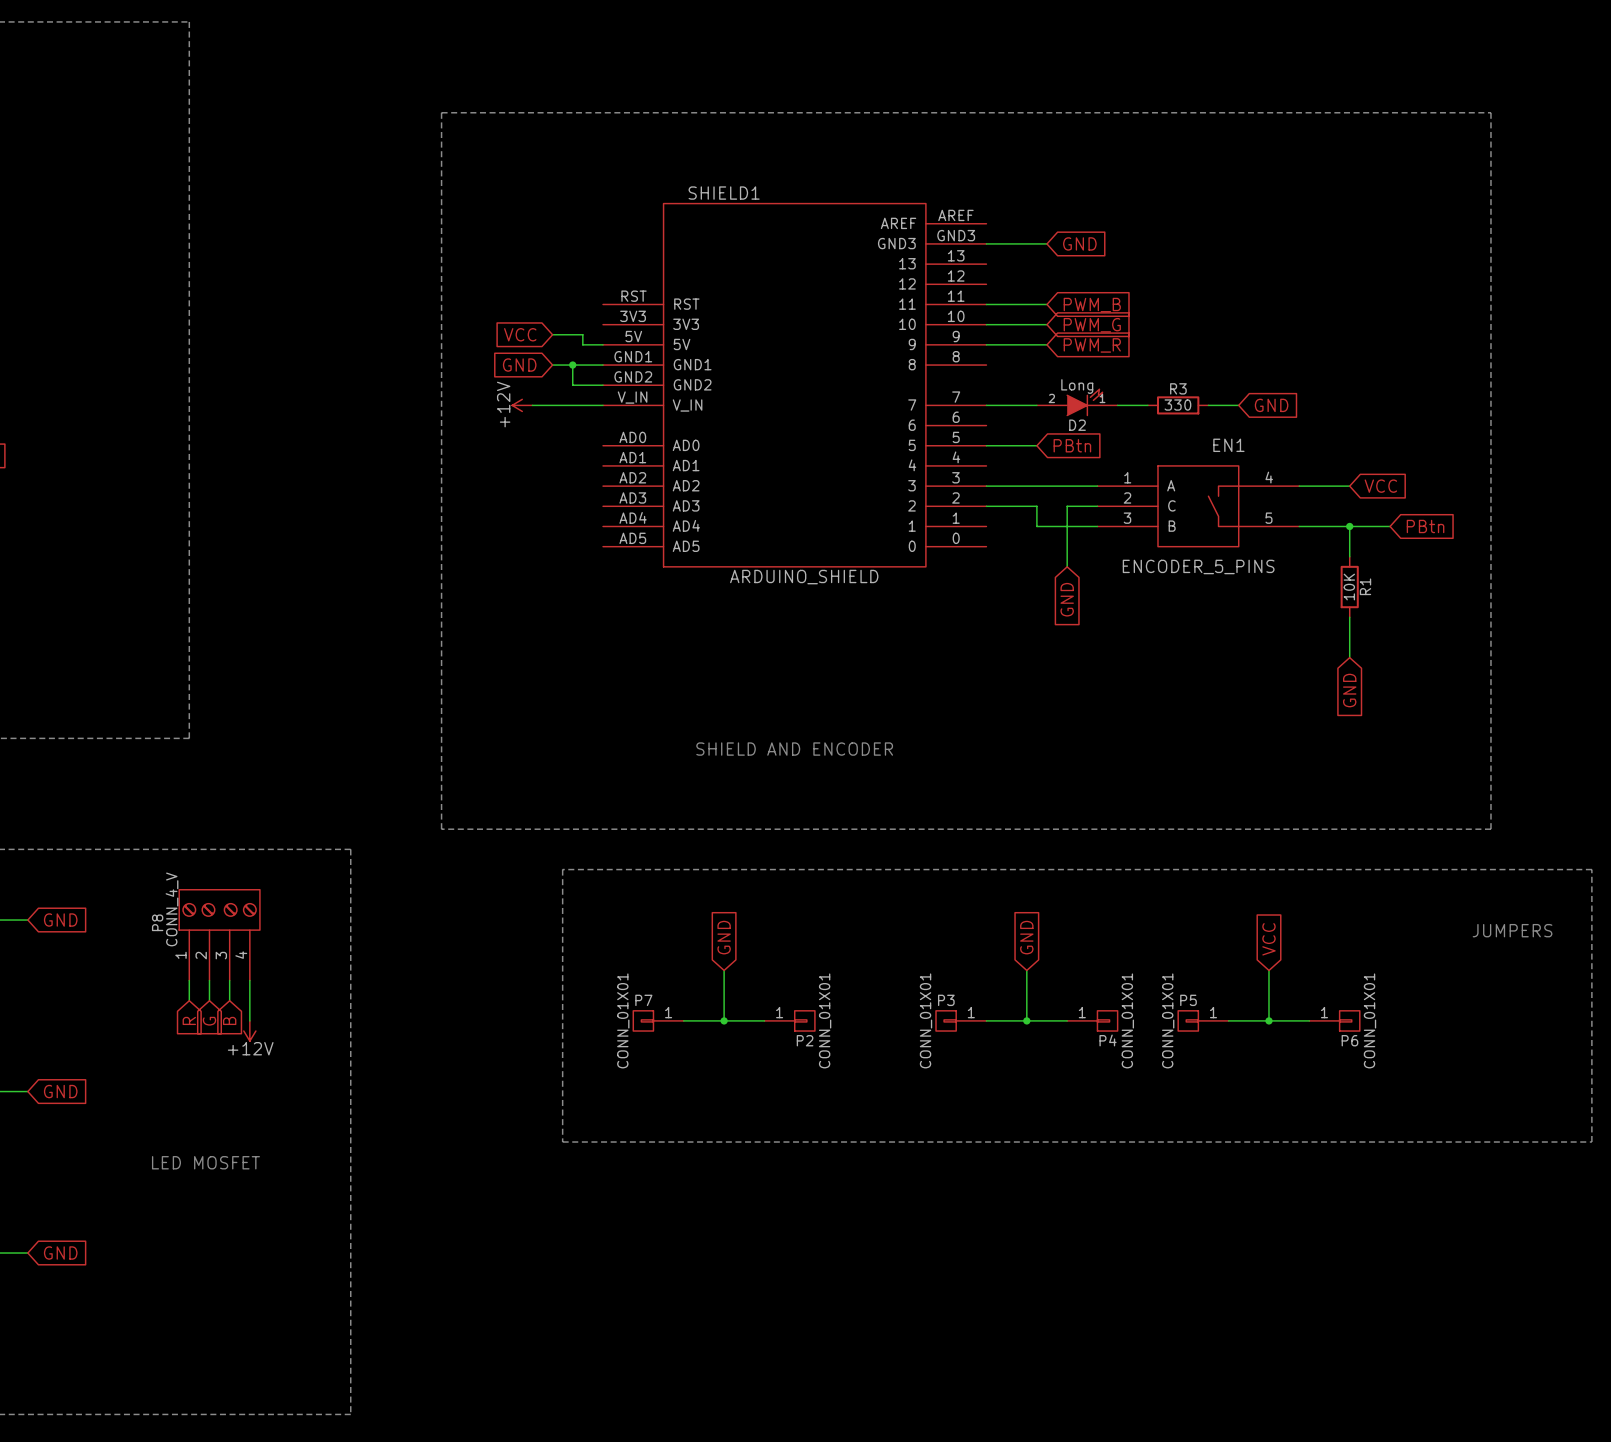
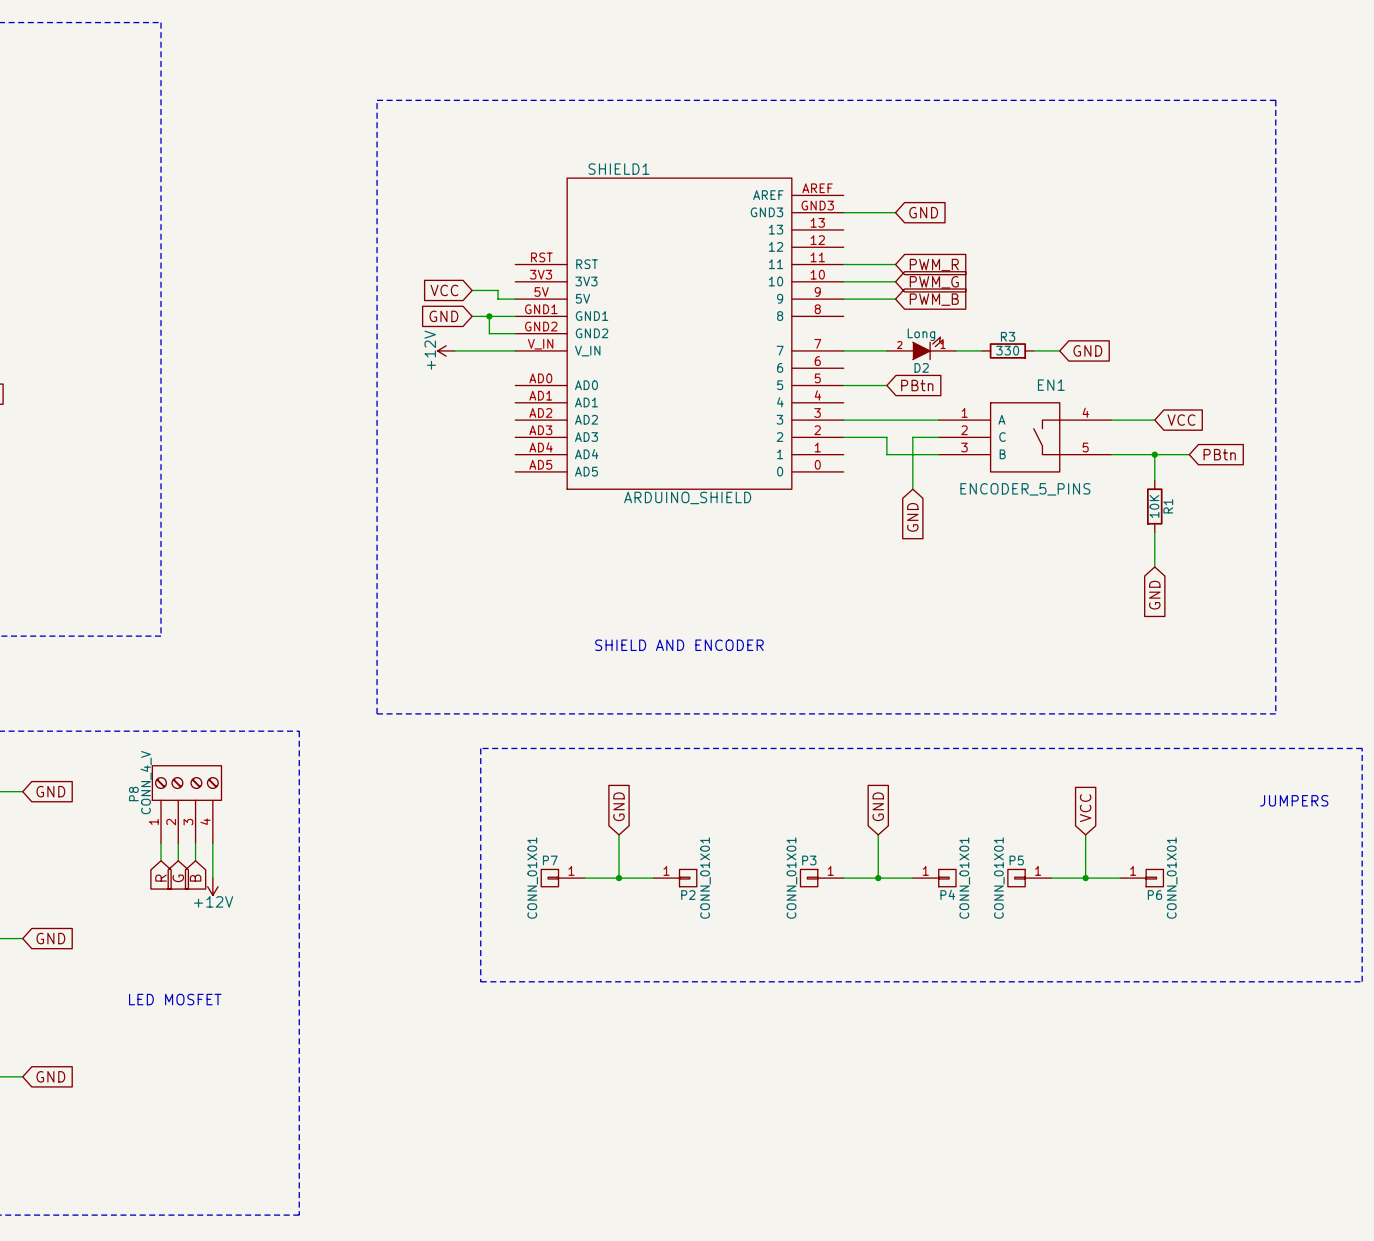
global label: PWM_B (1092, 305) -> PWM_R (934, 265)
global label: PWM_R (1092, 345) -> PWM_B (934, 299)

